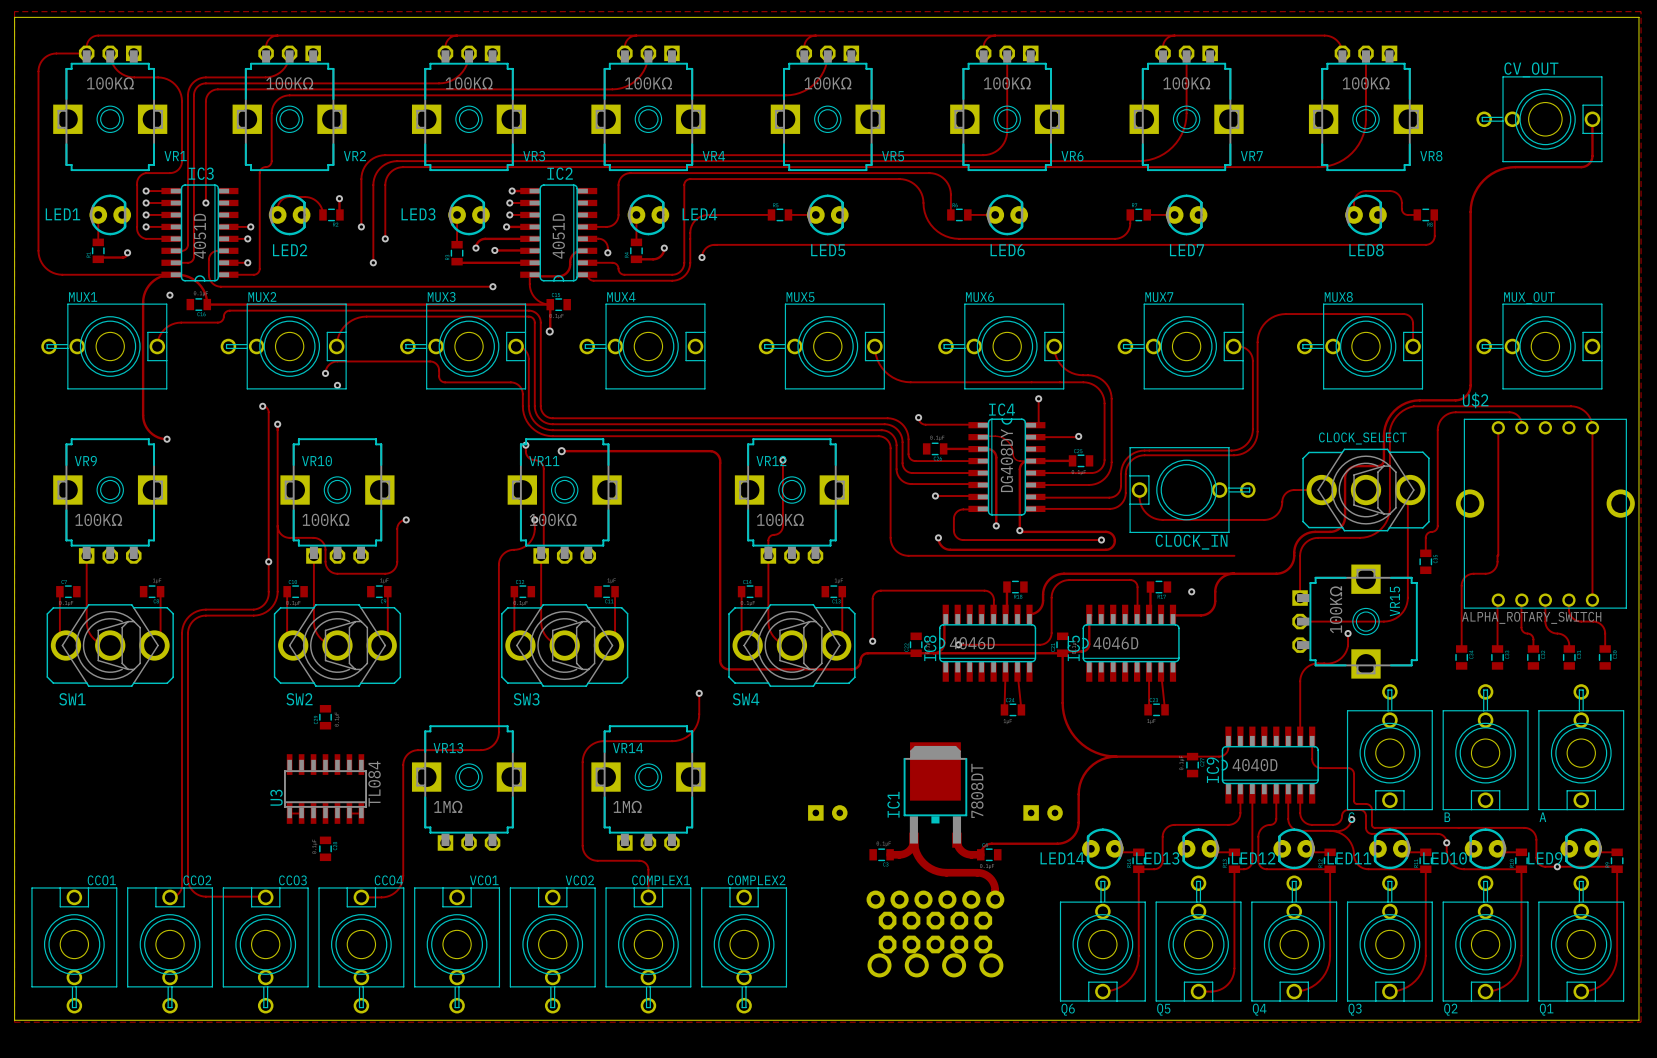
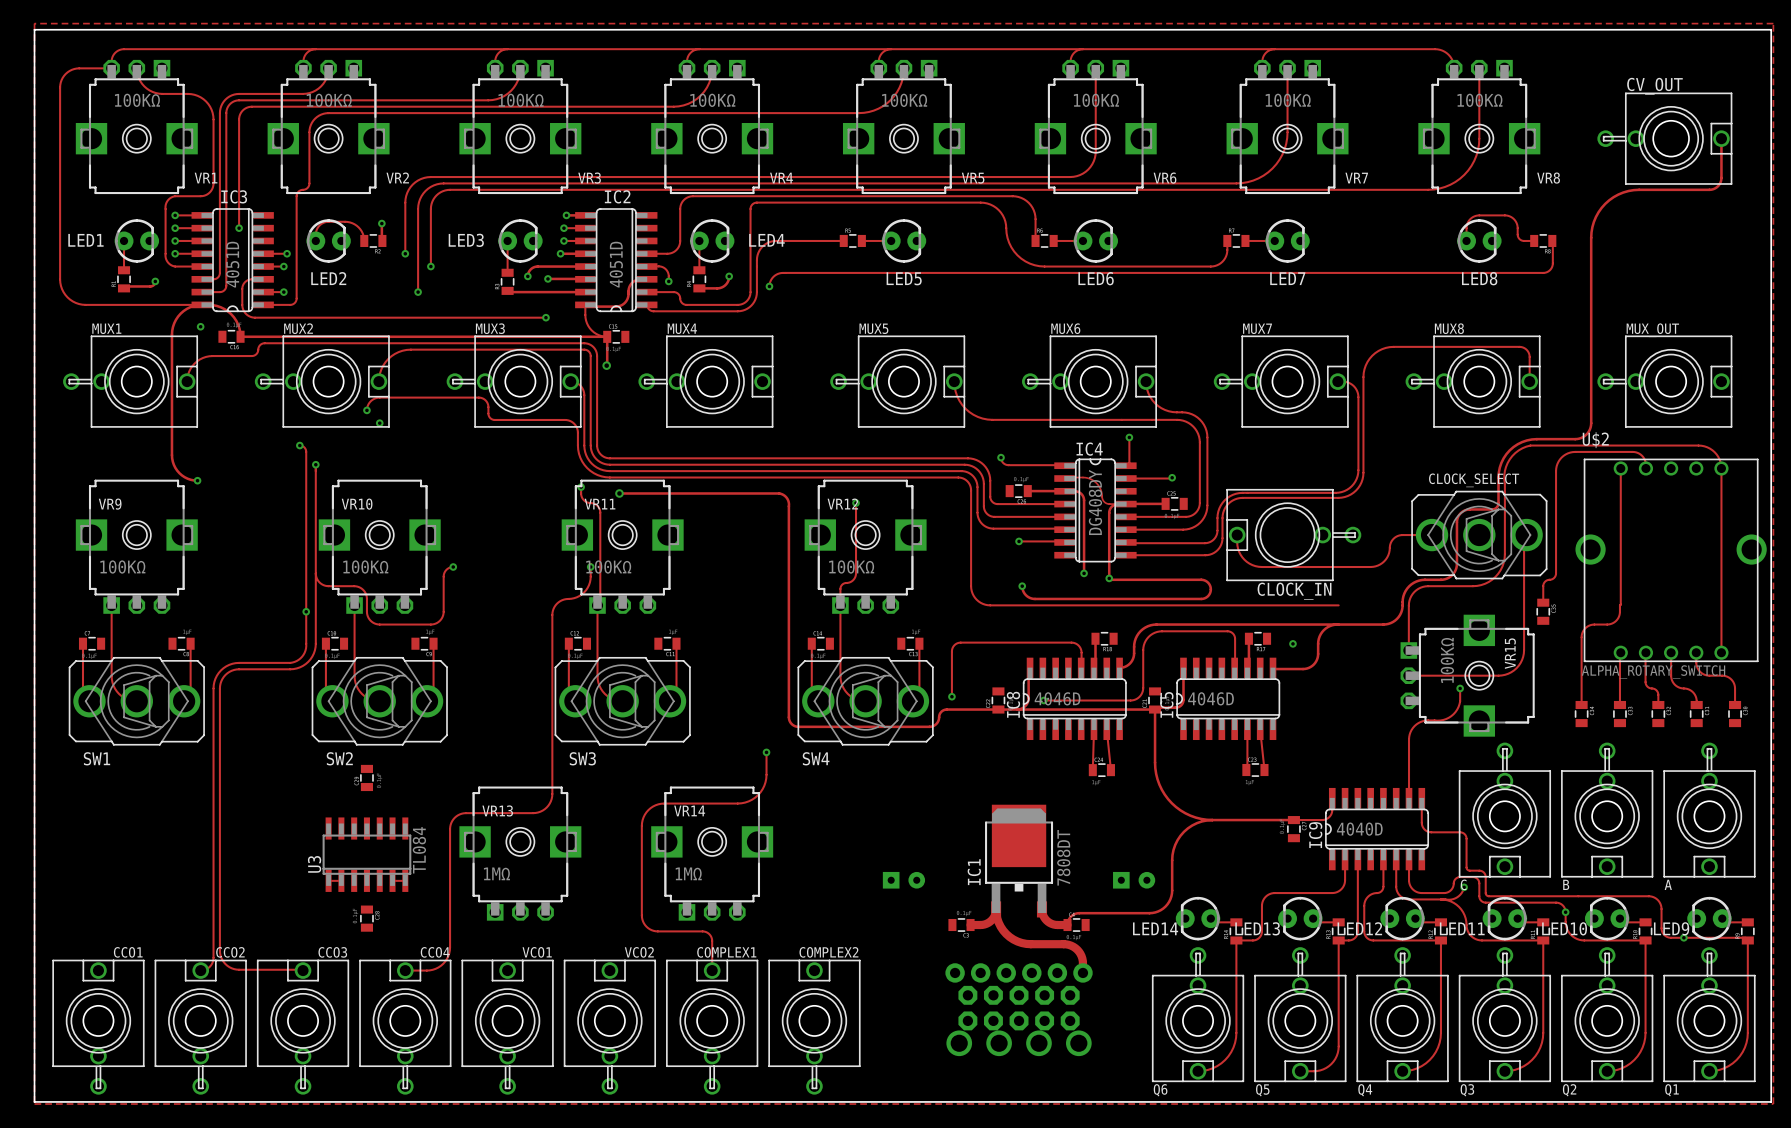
track: (977, 508) (962, 509) (955, 513) (953, 531) (957, 538) (963, 540) (1101, 540) -> none
via: (1101, 540) -> none

